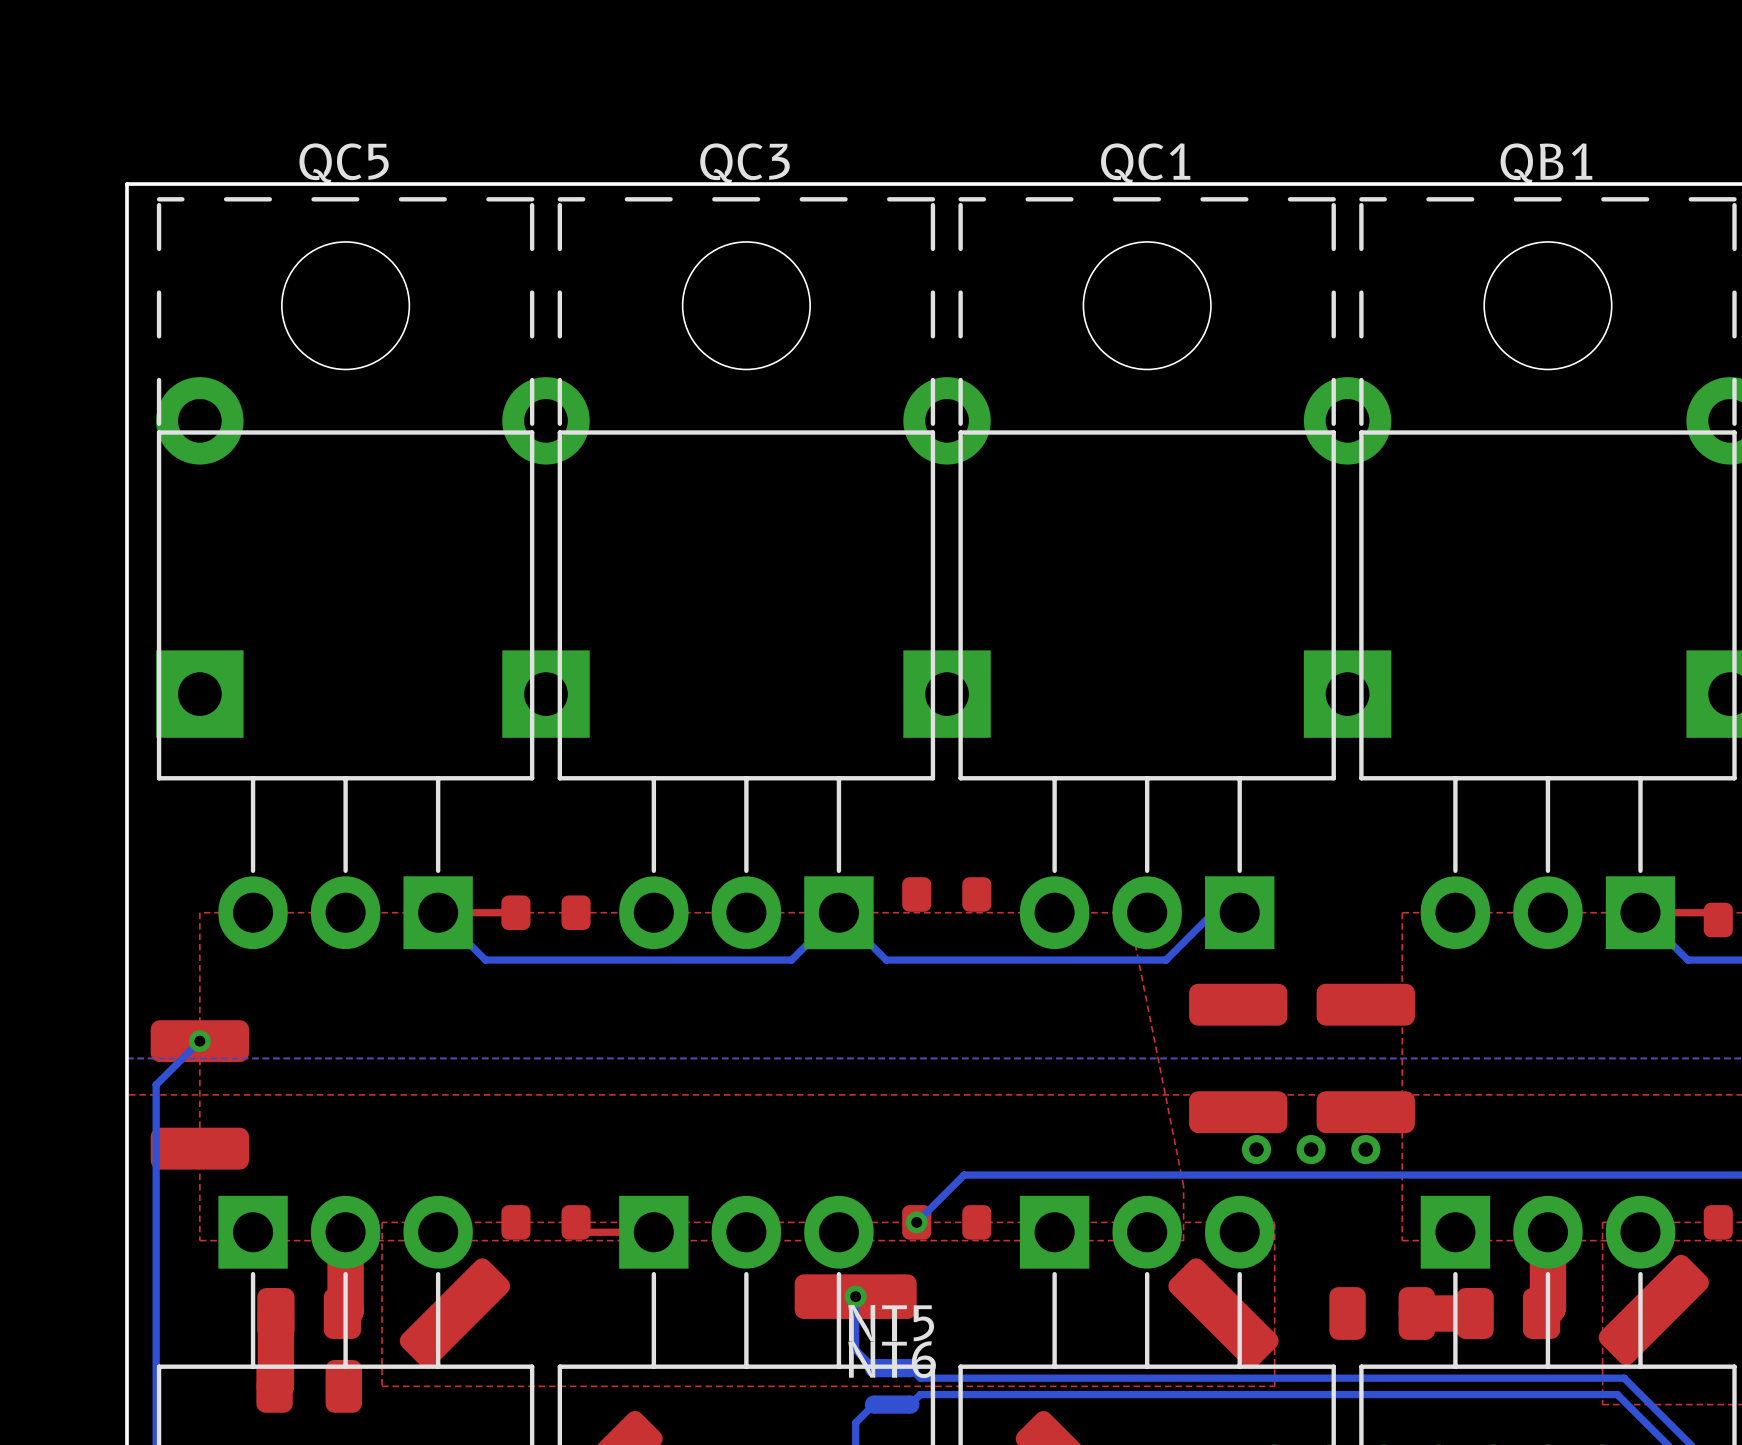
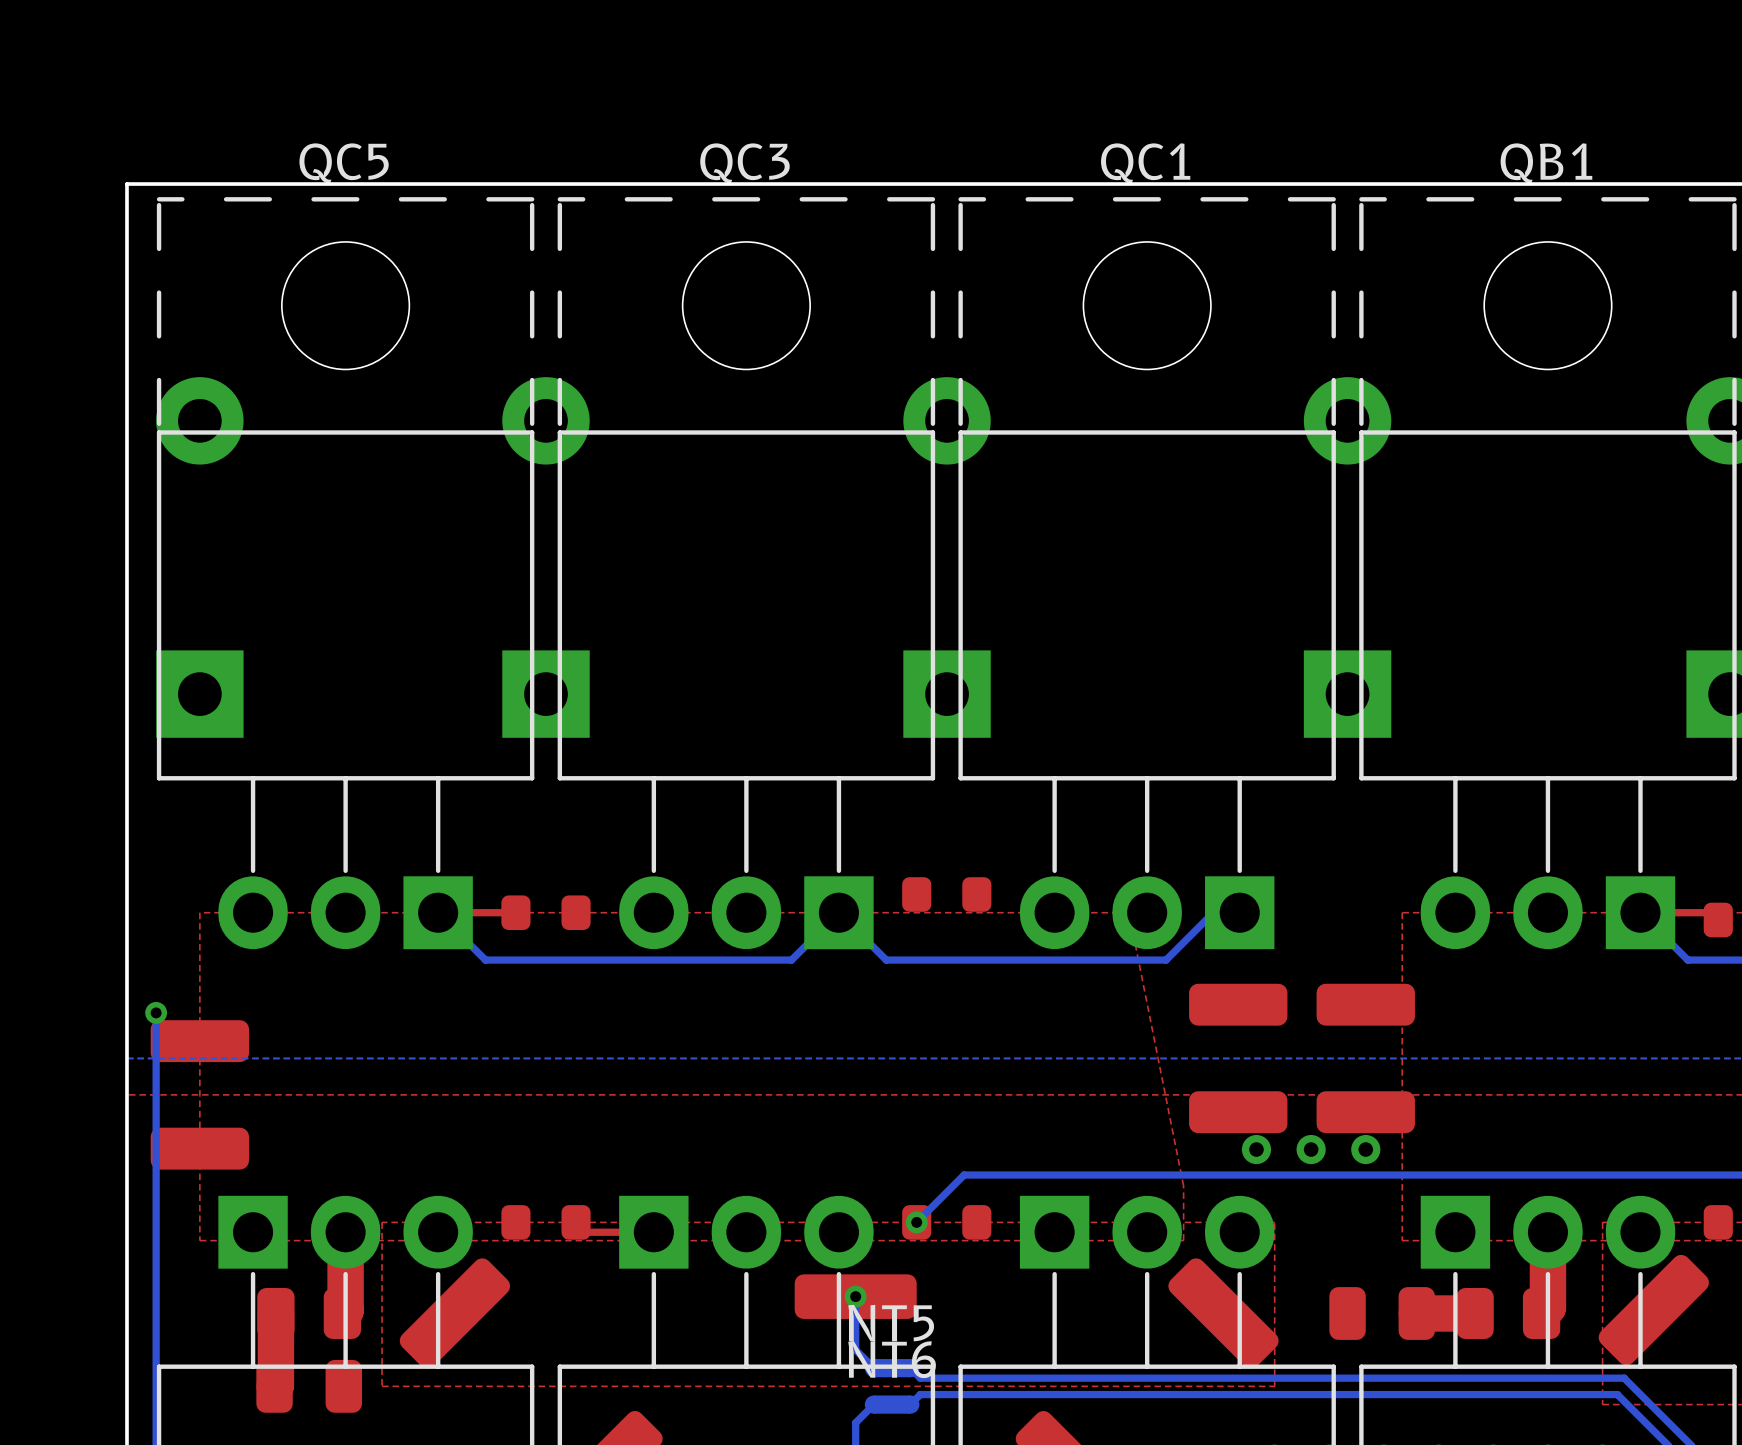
bottom track: (199, 1041) (156, 1084) -> (156, 1012) (156, 1084)
via position: (199, 1041) -> (156, 1012)

